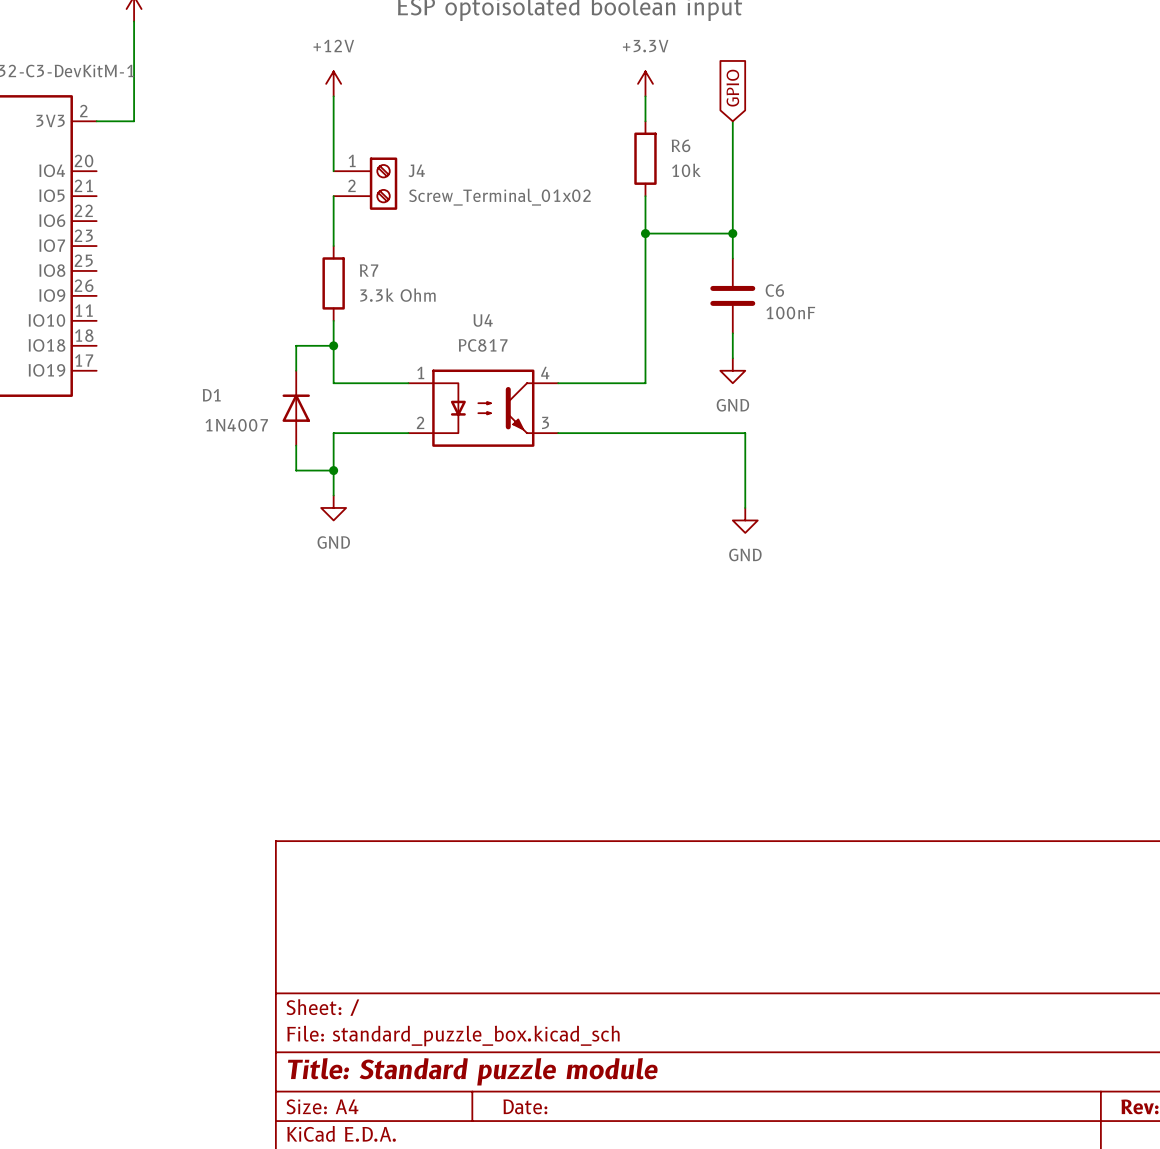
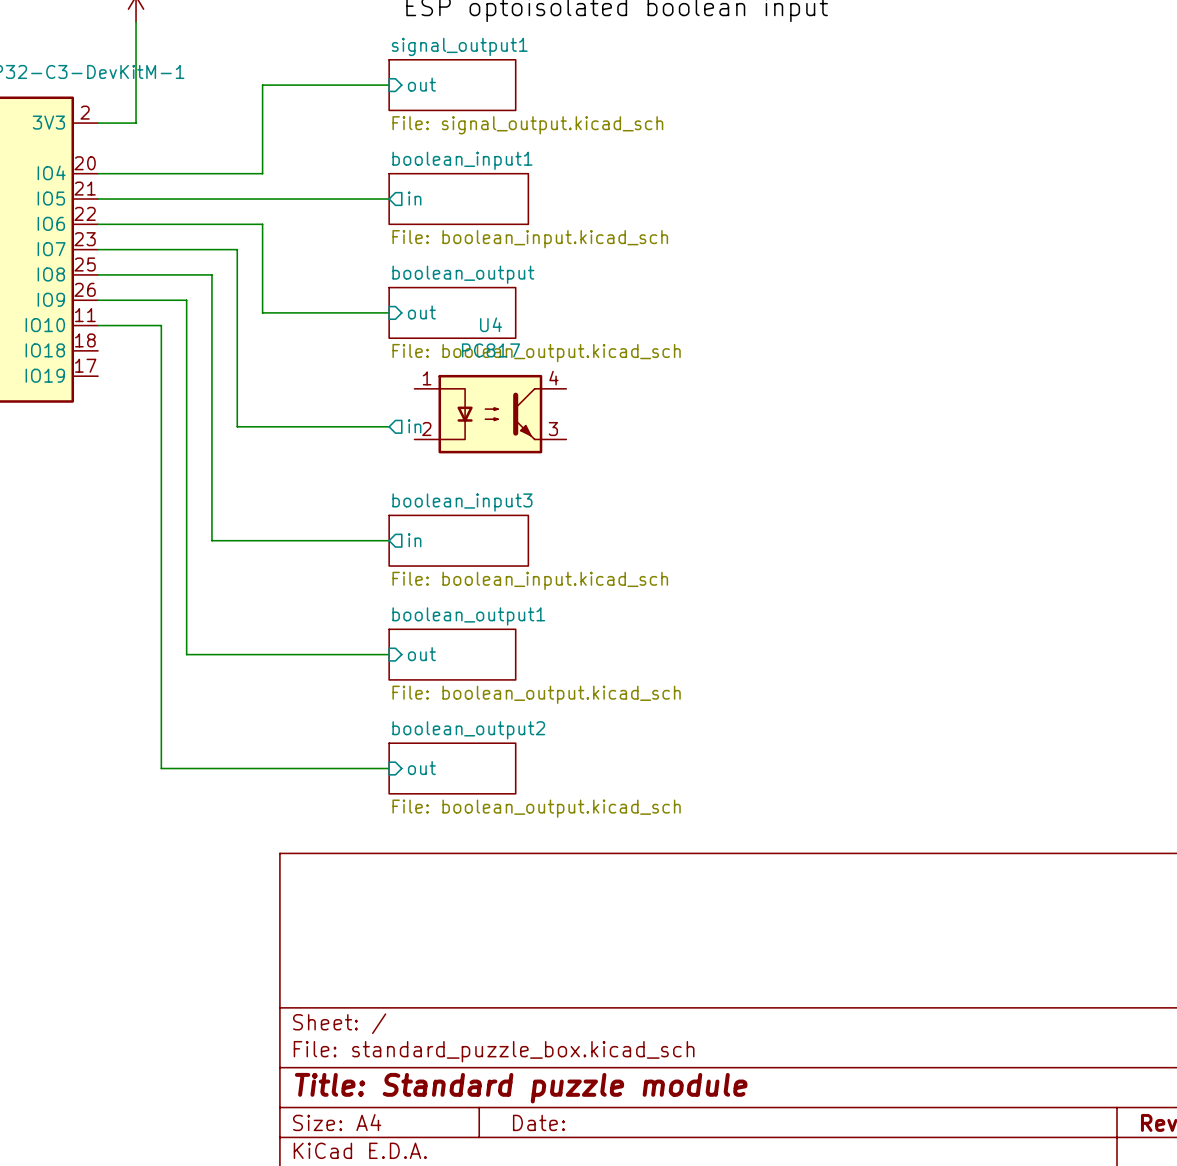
power symbol: +12V (333, 83) -> none
wire: none -> (389, 85) (262, 85) (262, 173) (98, 173)
sheet pin: none -> out (421, 84)
sheet signal_output1: none -> File: signal_output.kicad_sch (452, 85)
power symbol: +3.3V (645, 83) -> none
global label: GPIO (732, 88) -> none
wire: (333, 96) (333, 171) -> none
wire: (645, 96) (645, 121) -> none
wire: (732, 121) (732, 258) -> none
R6: 10k (645, 158) -> none
J4: Screw_Terminal_01x02 (365, 183) -> none
sheet pin: none -> in (414, 198)
wire: none -> (98, 199) (389, 199)
wire: (333, 196) (333, 246) -> none
sheet boolean_input1: none -> File: boolean_input.kicad_sch (458, 199)
wire: (645, 196) (645, 383) (558, 383) -> none
wire: none -> (98, 224) (262, 224) (262, 312) (389, 312)
wire: (645, 233) (732, 233) -> none
junction: (645, 233) -> none
junction: (732, 233) -> none
wire: none -> (98, 249) (237, 249) (237, 426) (389, 426)
wire: none -> (98, 274) (211, 274) (211, 540) (389, 540)
R7: 3.3k Ohm (333, 283) -> none
wire: none -> (98, 300) (186, 300) (186, 654) (389, 654)
C6: 100nF (732, 295) -> none
sheet pin: none -> out (421, 312)
sheet boolean_output: none -> File: boolean_output.kicad_sch (452, 312)
wire: none -> (98, 325) (161, 325) (161, 768) (389, 768)
wire: (333, 320) (333, 383) (408, 383) -> none
wire: (732, 333) (732, 358) -> none
wire: (333, 345) (296, 345) (296, 370) -> none
junction: (333, 345) -> none
power symbol: GND (732, 370) -> none
D1: 1N4007 (296, 408) -> none
sheet pin: none -> in (414, 426)
wire: (408, 433) (333, 433) (333, 495) -> none
wire: (558, 433) (745, 433) (745, 507) -> none
wire: (296, 445) (296, 470) (333, 470) -> none
junction: (333, 470) -> none
power symbol: GND (333, 507) -> none
power symbol: GND (745, 520) -> none
sheet pin: none -> in (414, 540)
sheet boolean_input3: none -> File: boolean_input.kicad_sch (458, 540)
sheet pin: none -> out (421, 654)
sheet boolean_output1: none -> File: boolean_output.kicad_sch (452, 654)
sheet pin: none -> out (421, 768)
sheet boolean_output2: none -> File: boolean_output.kicad_sch (452, 768)

